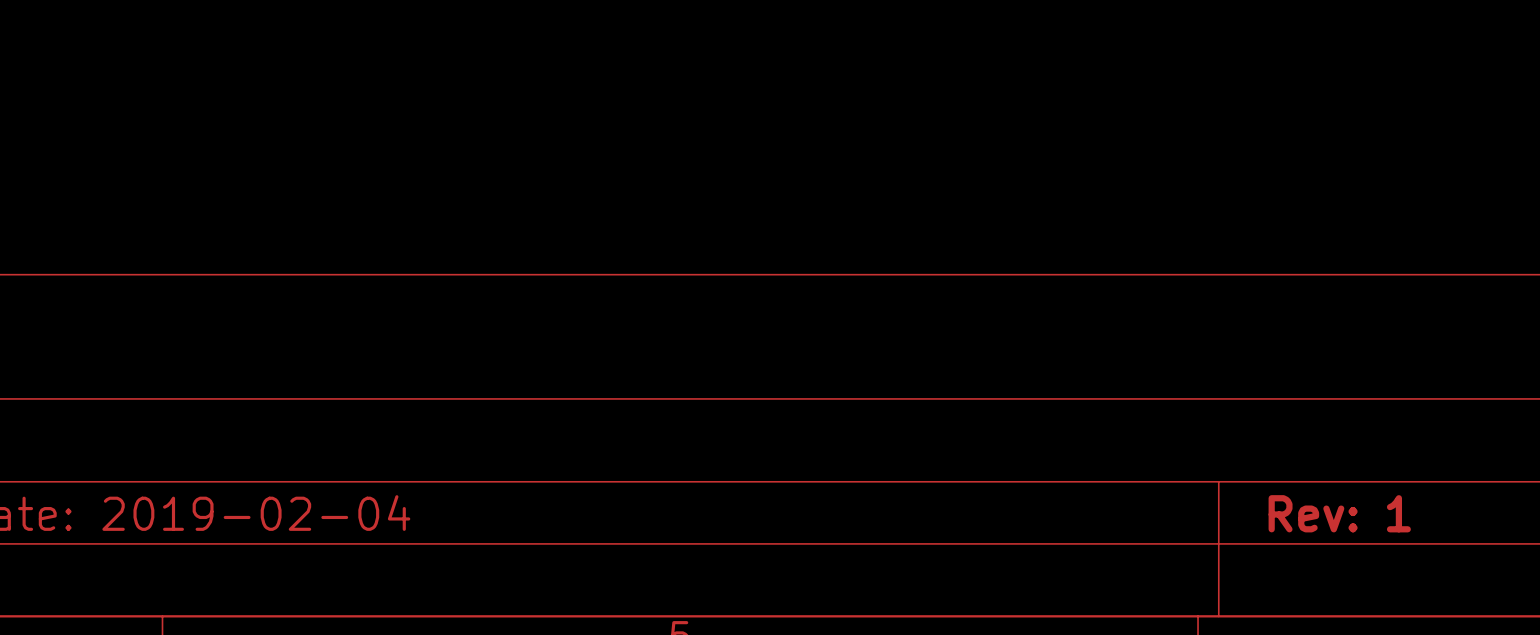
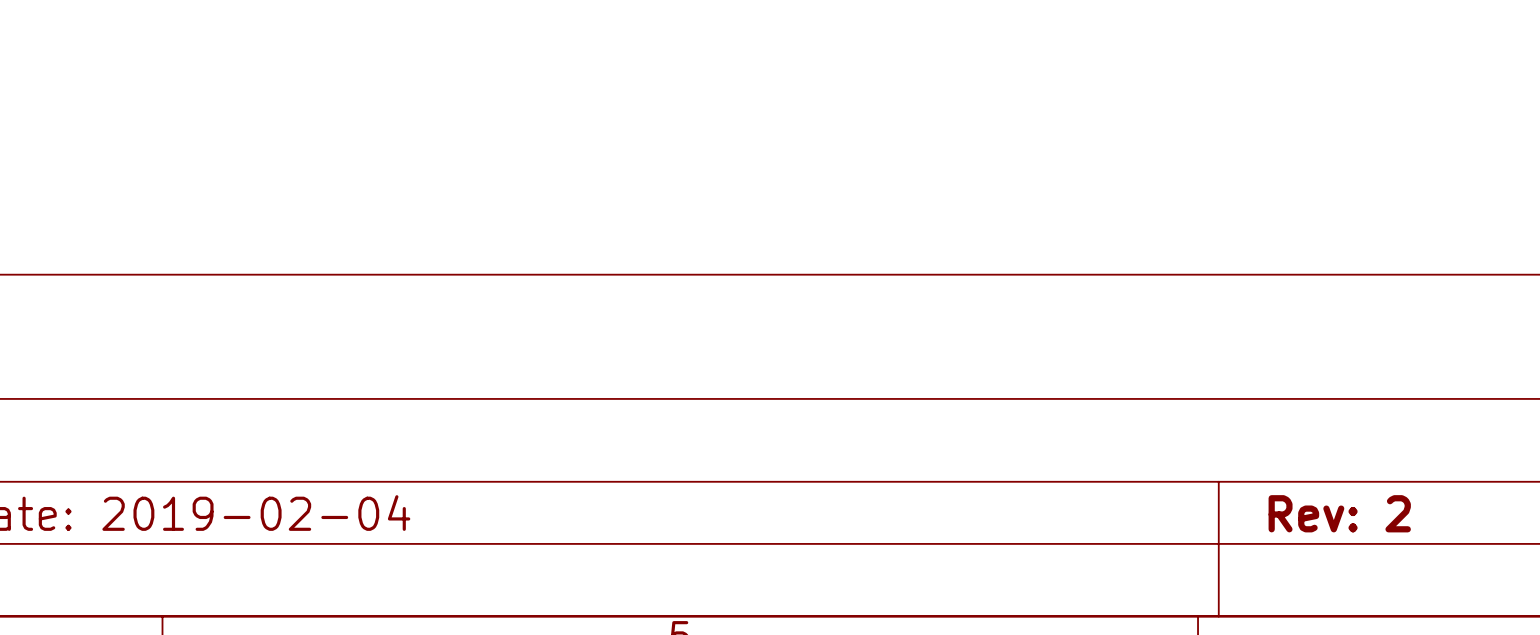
title block: Rev: 1 (1339, 513) -> Rev: 2 (1339, 513)

